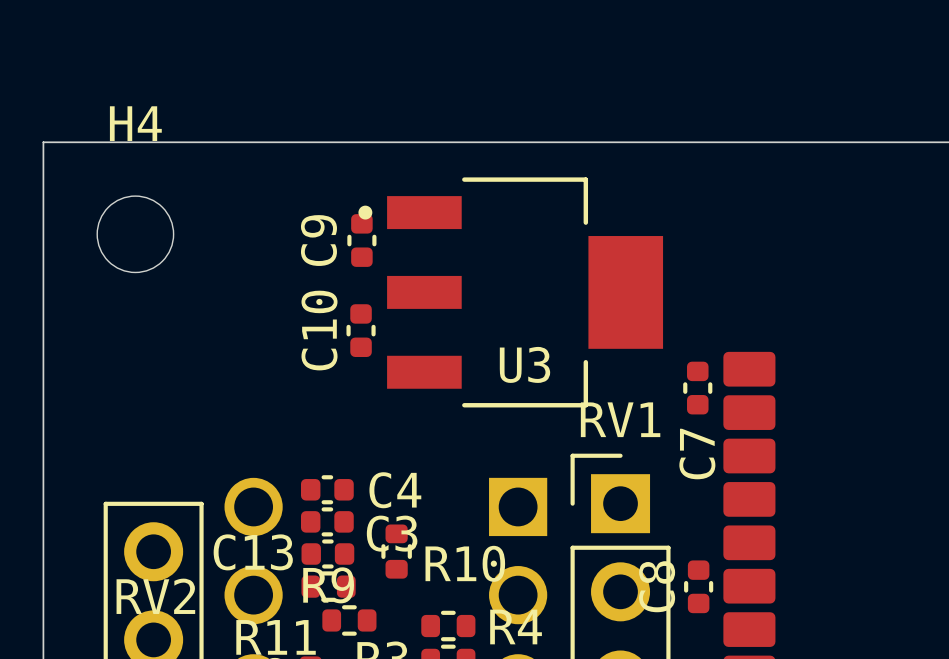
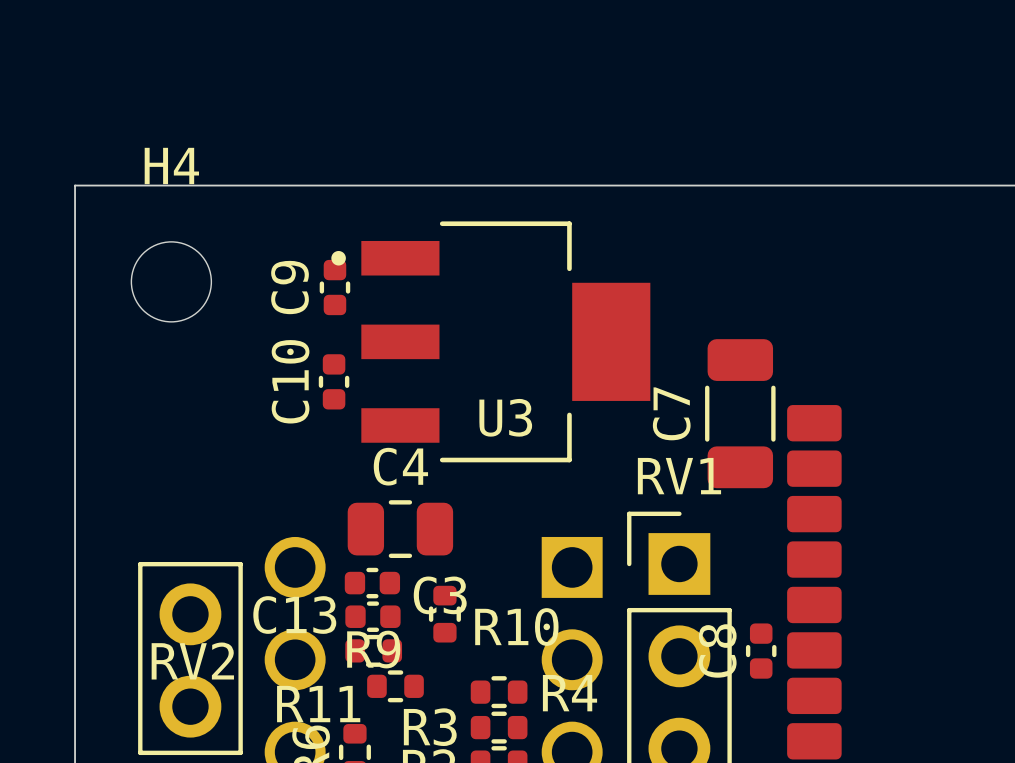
C9 position: (361, 240) -> (334, 287)
U3 position: (510, 292) -> (490, 341)
C10 position: (361, 330) -> (334, 381)
C7 footprint: [683, 361, 713, 415] -> [705, 339, 776, 489]
C7 name position: C7 (697, 454) -> C7 (671, 413)
C4 footprint: [300, 475, 354, 505] -> [347, 500, 454, 558]
C4 name position: C4 (395, 490) -> C4 (400, 466)

